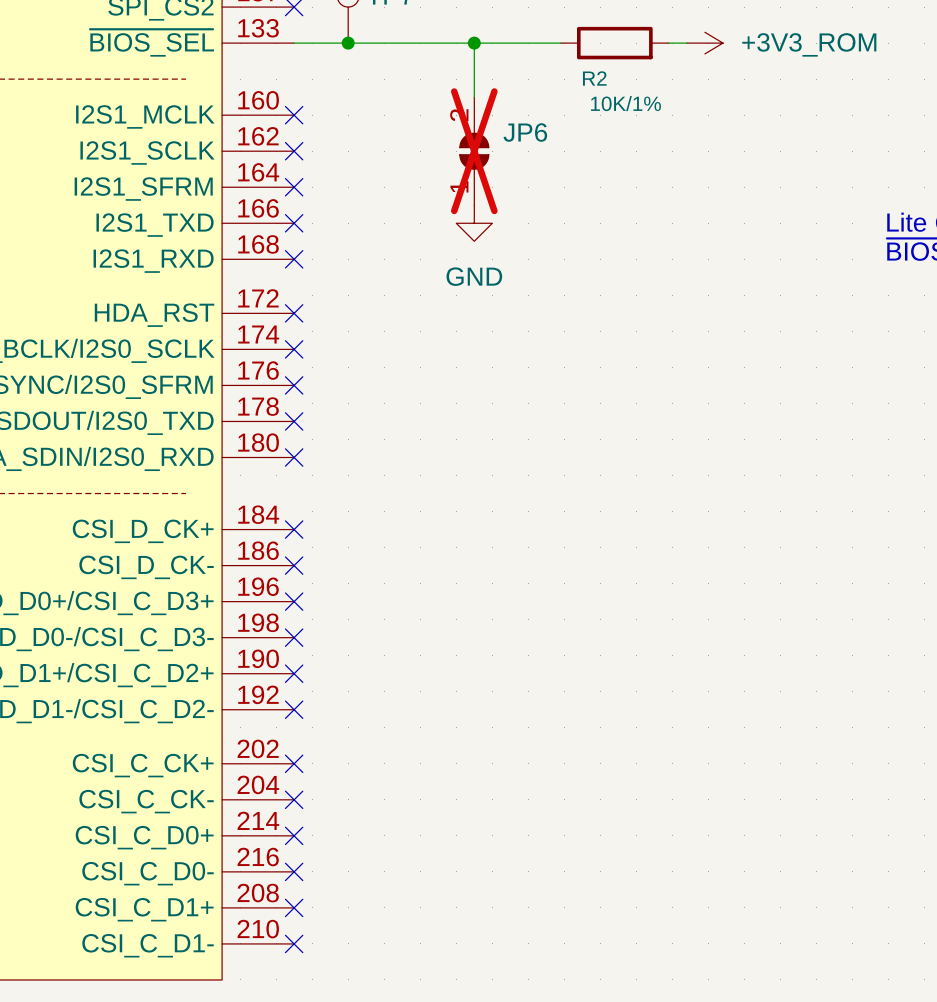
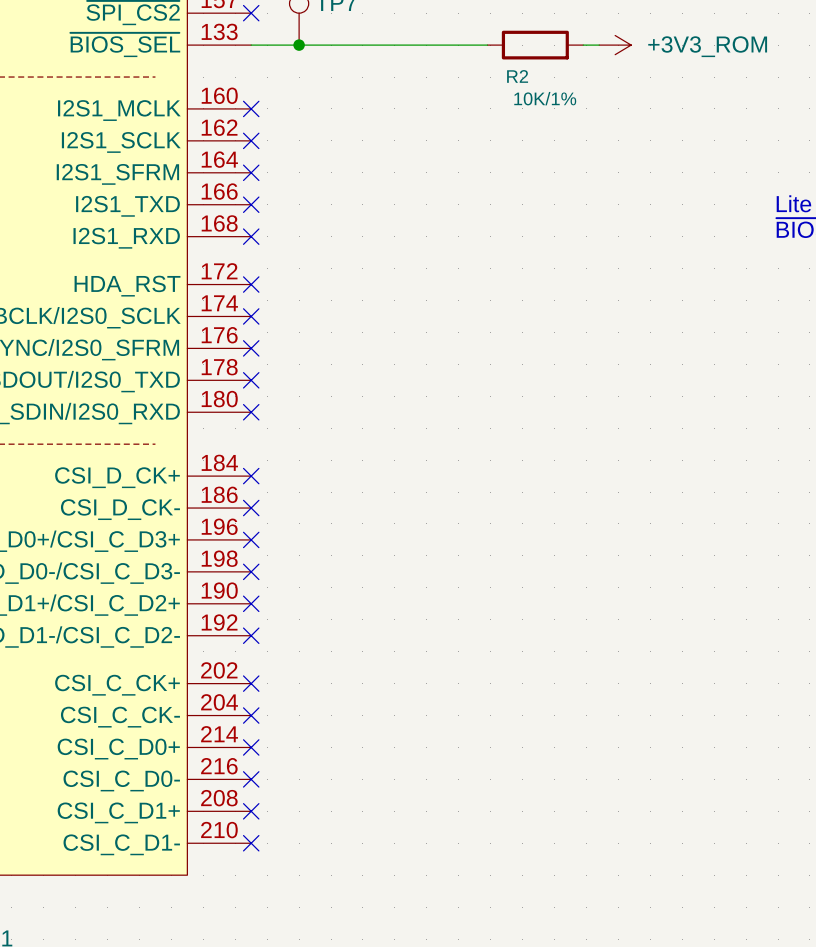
wire: (474, 43) (474, 97) -> none
junction: (474, 43) -> none
JP6: (474, 151) -> none
power symbol: GND (474, 223) -> none

